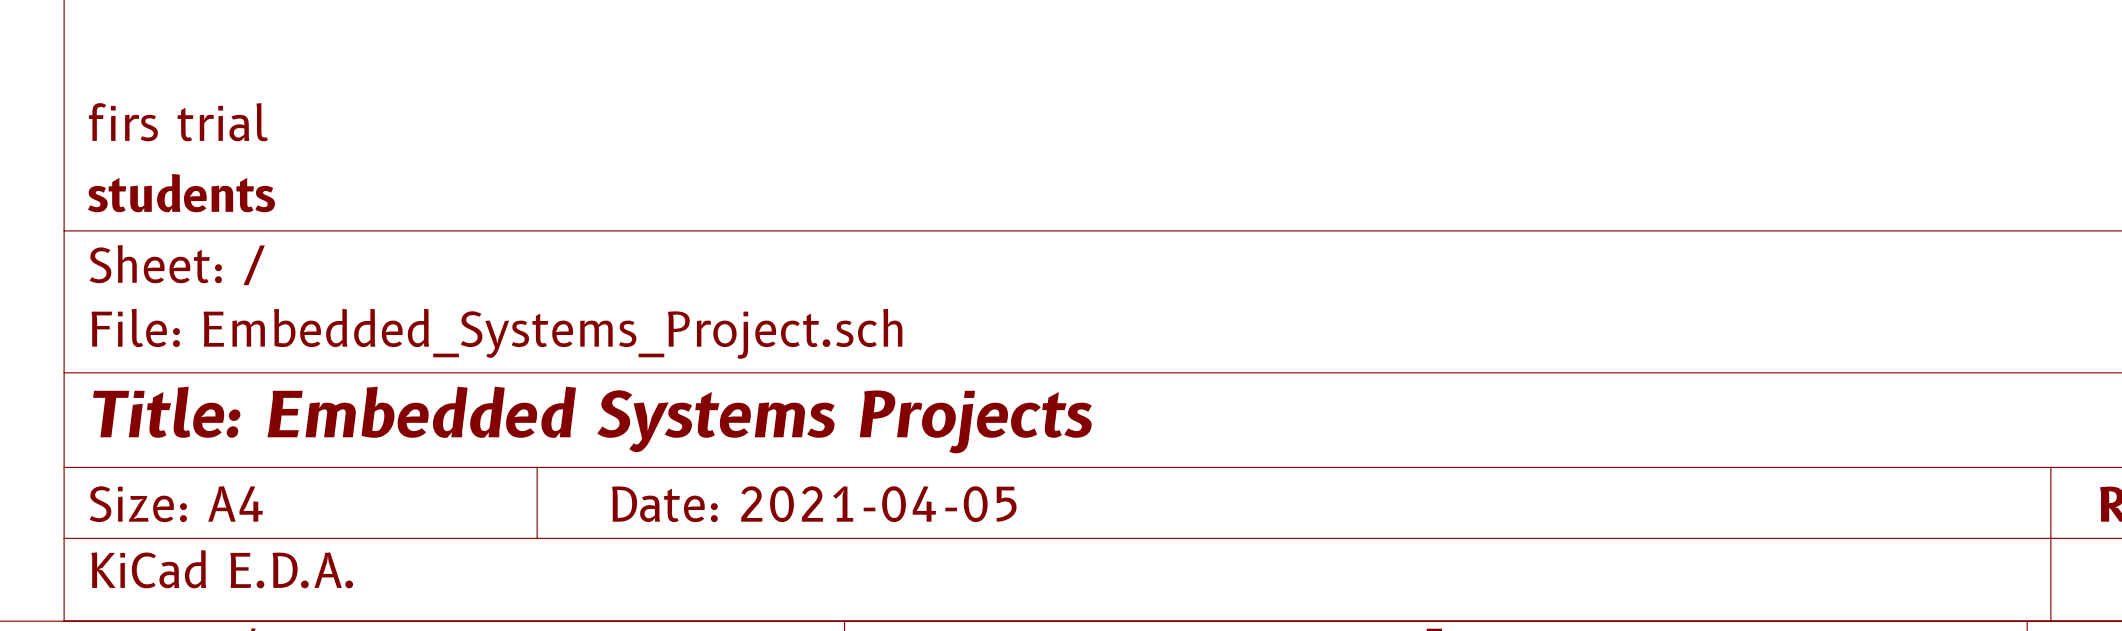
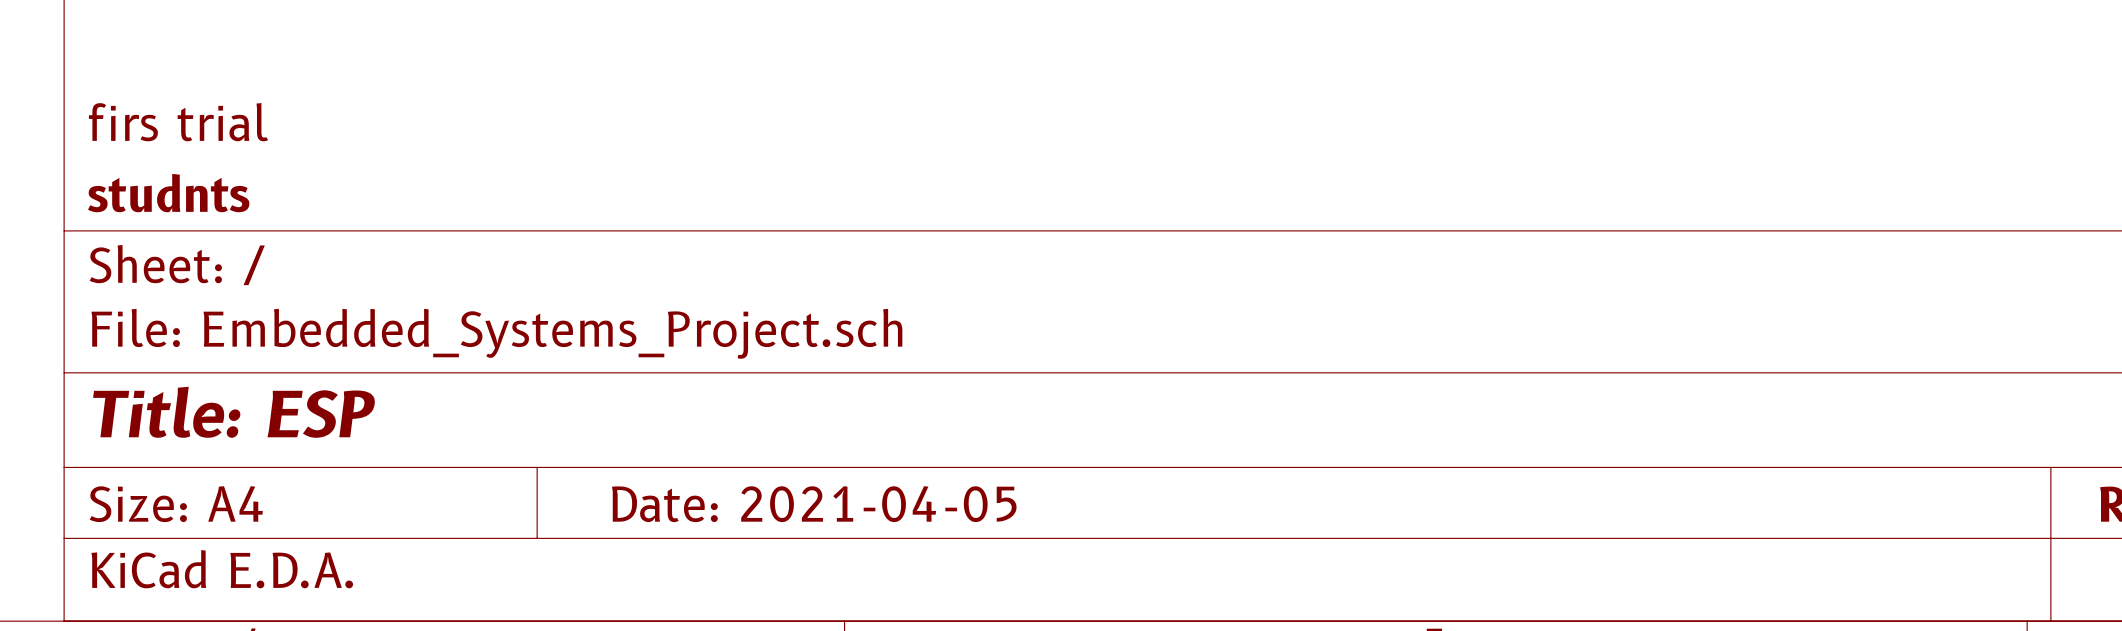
title block: students (181, 193) -> studnts (168, 193)
title block: Title: Embedded Systems Projects (592, 420) -> Title: ESP (234, 412)

